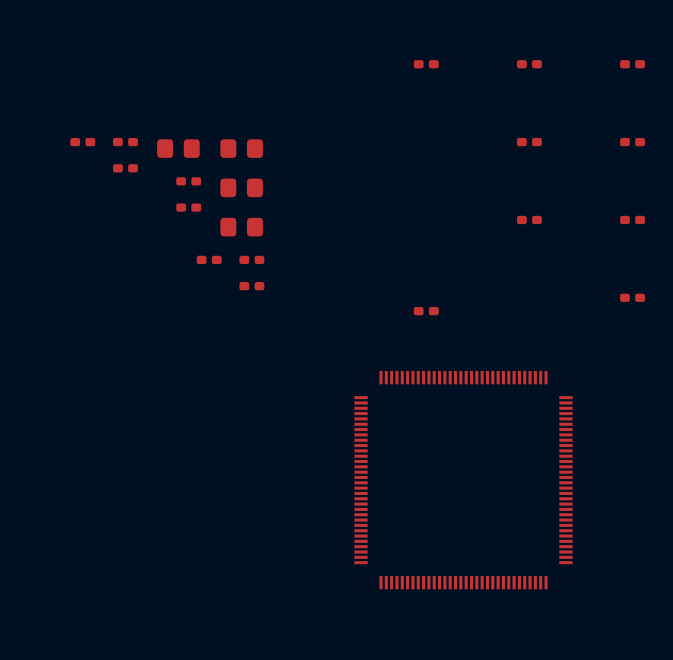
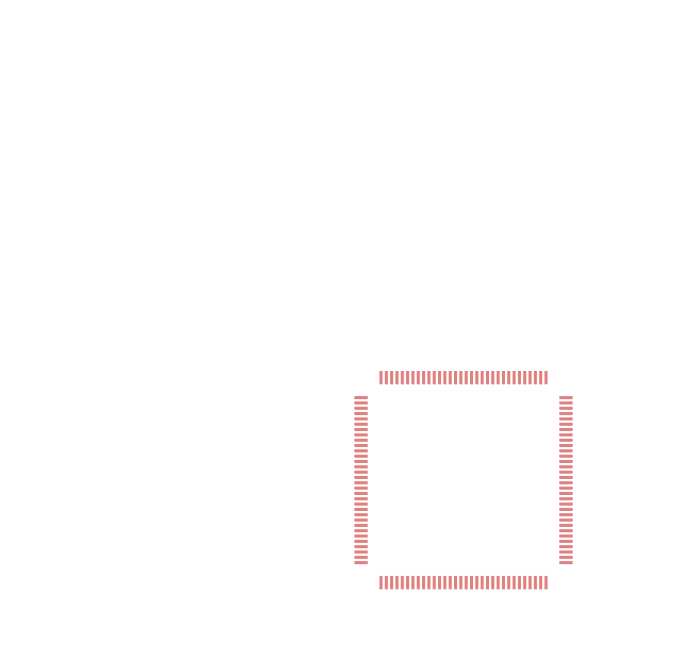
part: (426, 64) -> none
part: (529, 64) -> none
part: (632, 64) -> none
part: (82, 142) -> none
part: (125, 142) -> none
part: (529, 142) -> none
part: (632, 142) -> none
part: (178, 148) -> none
part: (241, 148) -> none
part: (125, 168) -> none
part: (188, 181) -> none
part: (241, 187) -> none
part: (188, 207) -> none
part: (529, 219) -> none
part: (632, 219) -> none
part: (241, 227) -> none
part: (209, 259) -> none
part: (251, 259) -> none
part: (251, 286) -> none
part: (632, 297) -> none
part: (426, 311) -> none

